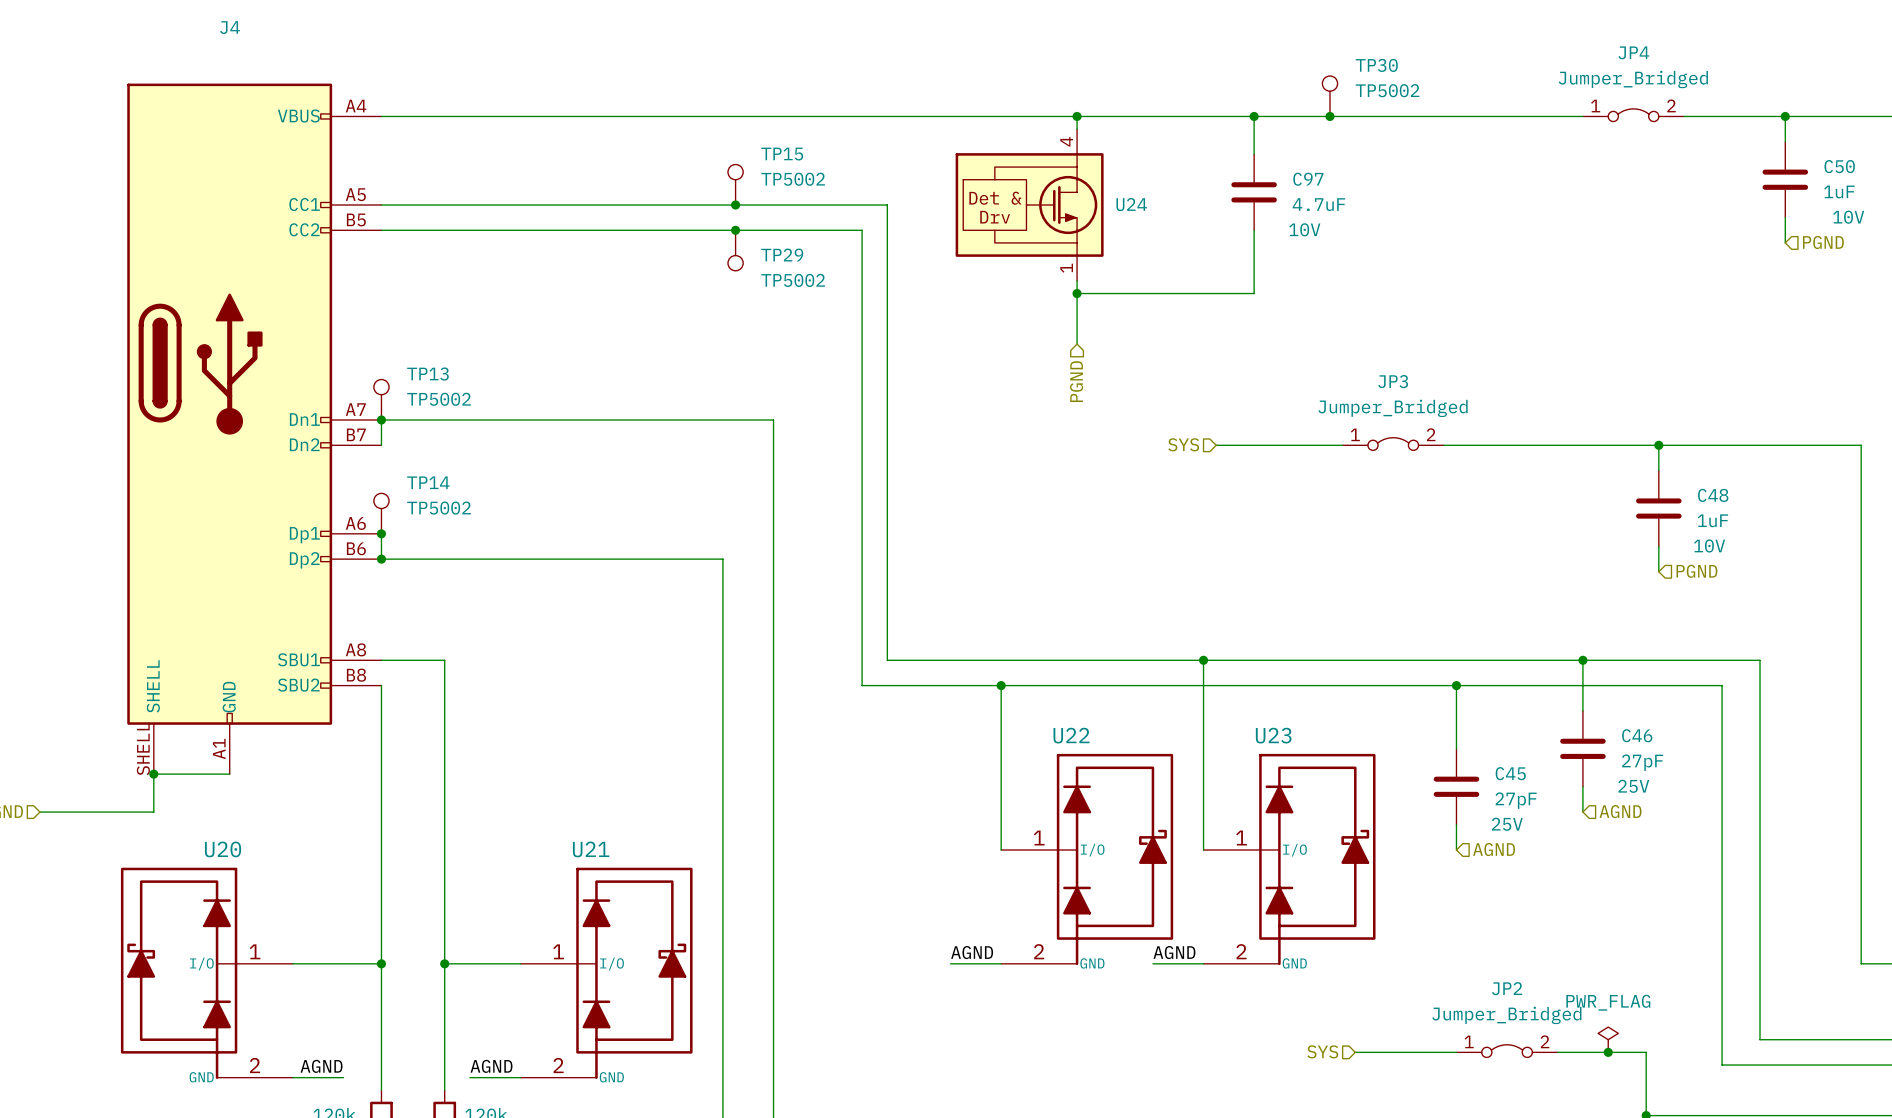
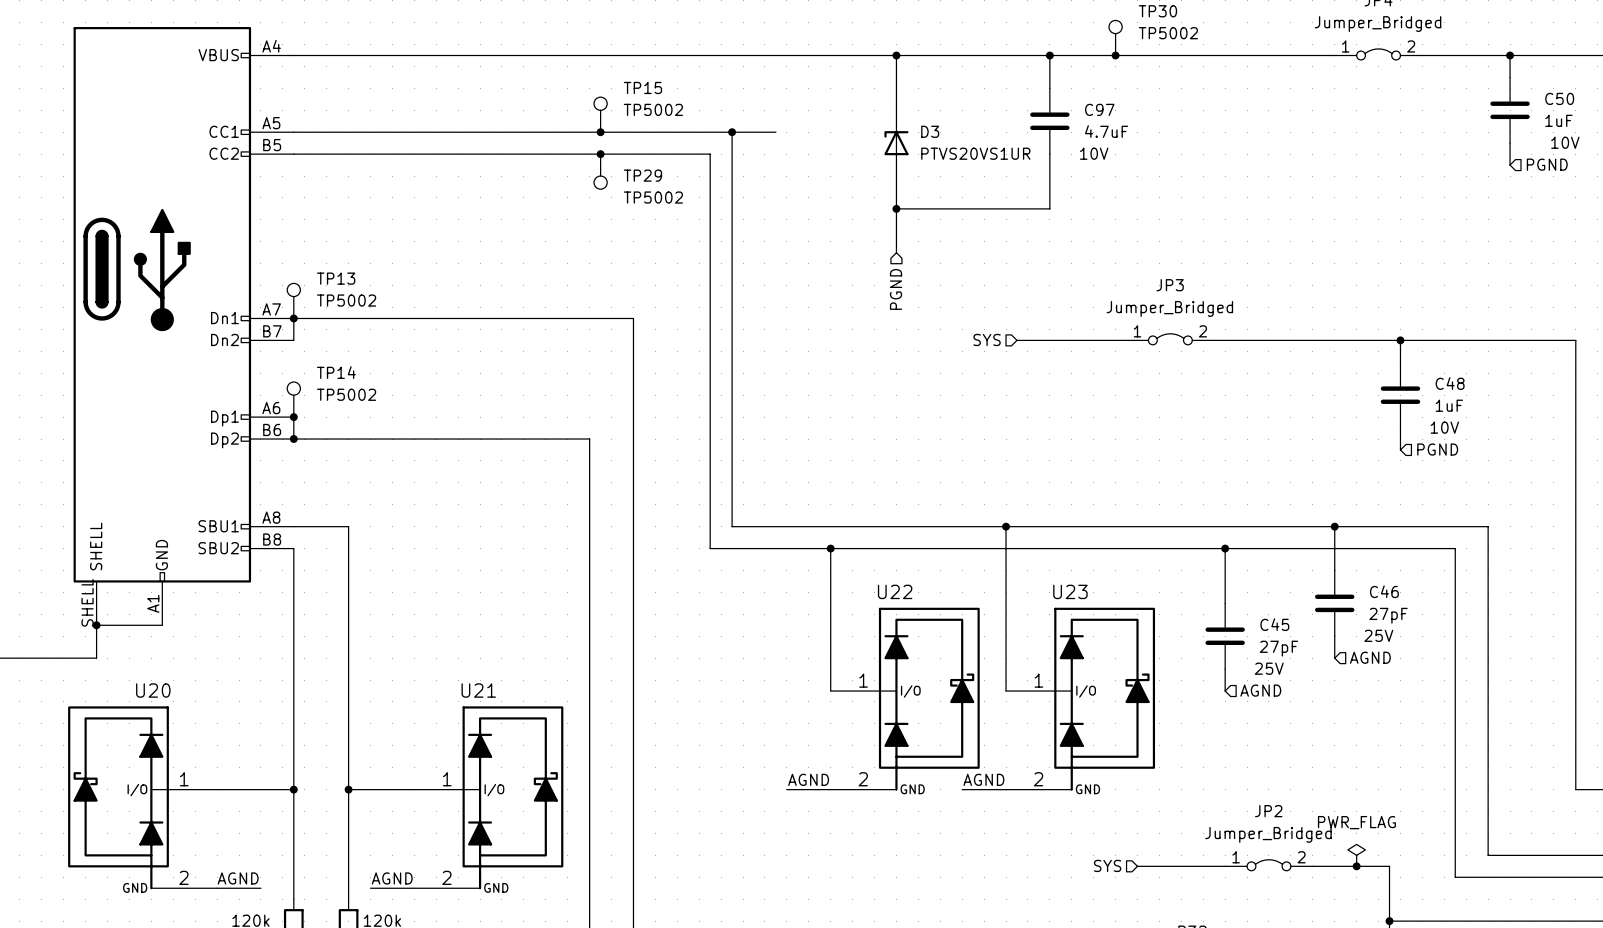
wire: none -> (732, 132) (775, 132)
junction: none -> (732, 132)
U24: (1029, 205) -> none
D3: none -> PTVS20VS1UR (896, 143)

